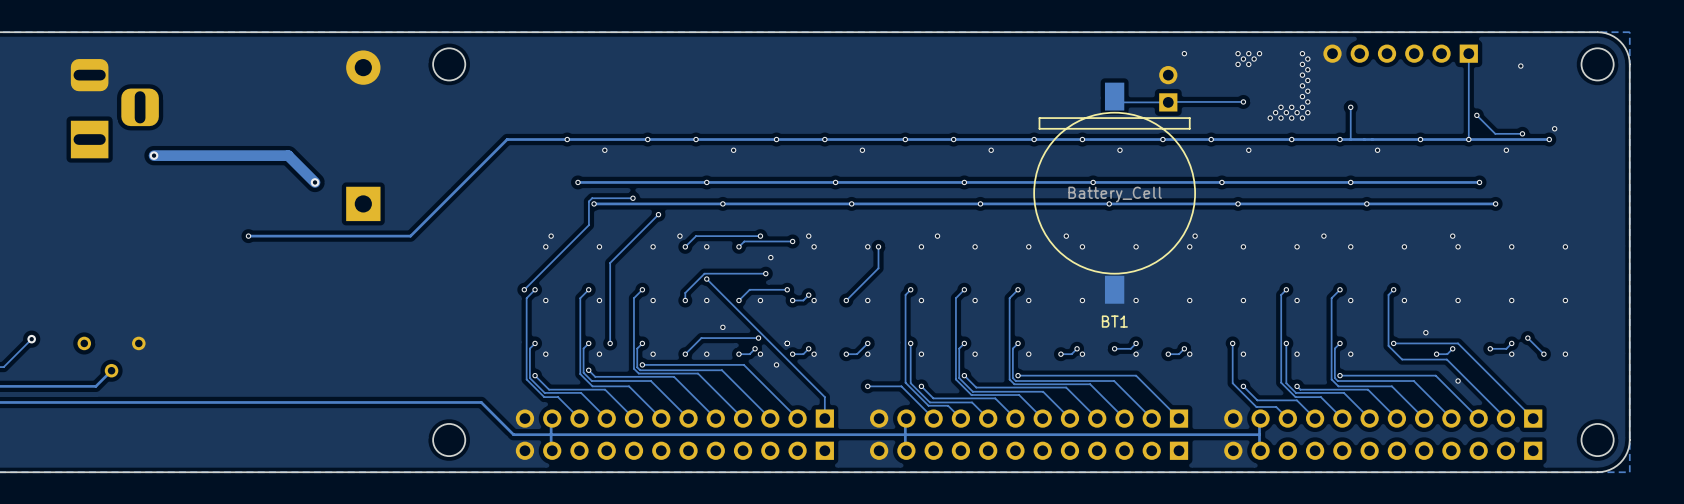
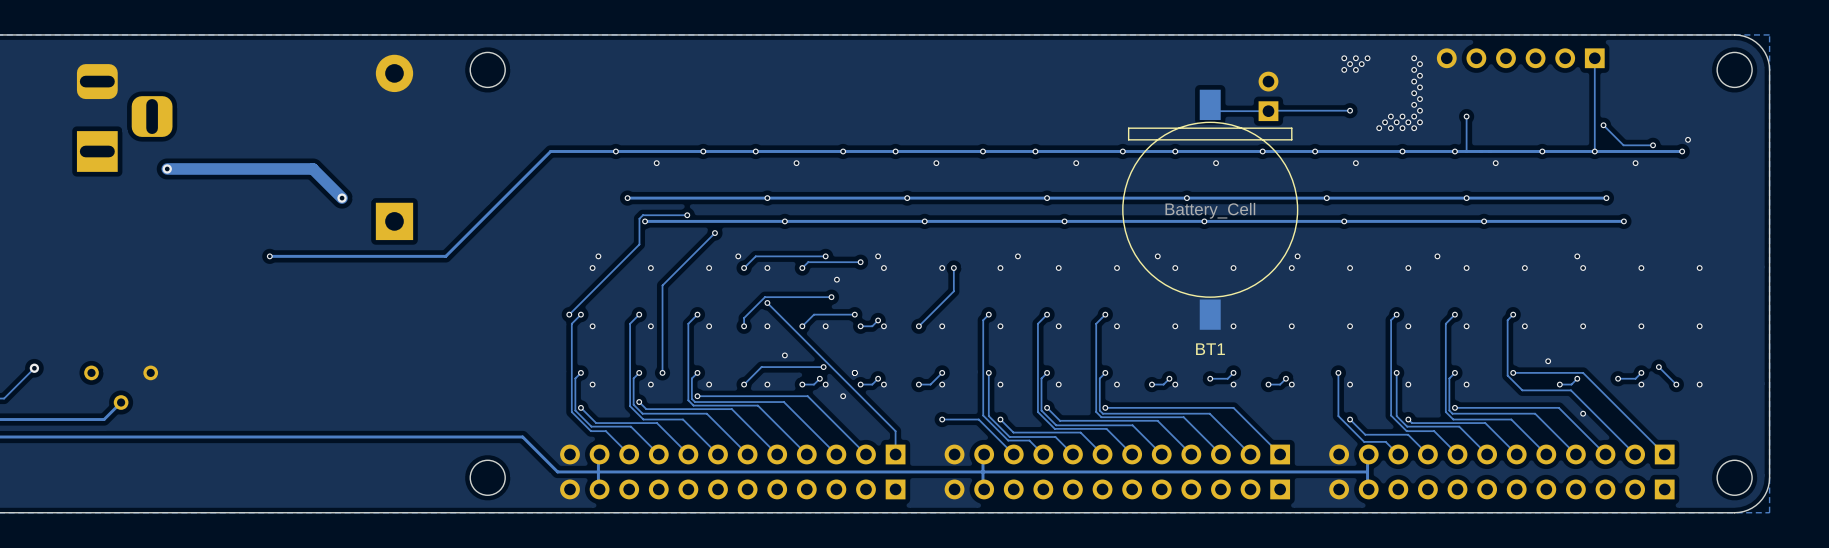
via: (1184, 53) -> none
via: (1520, 66) -> none

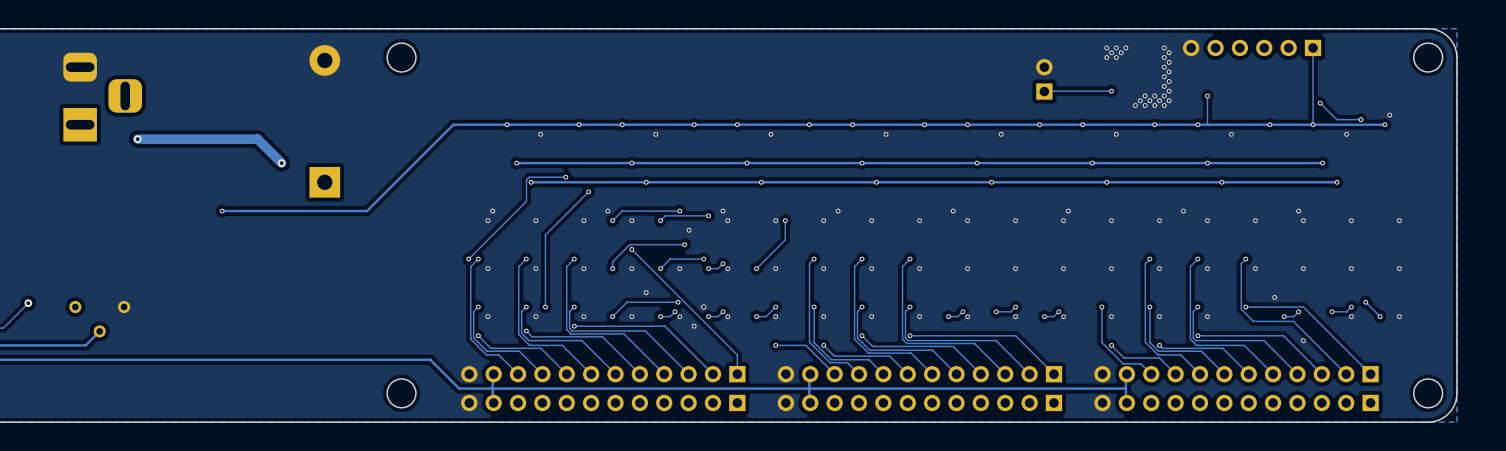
track: (1210, 104) (1216, 111) (1268, 111) -> none
BT1: Battery_Cell (1210, 209) -> none

